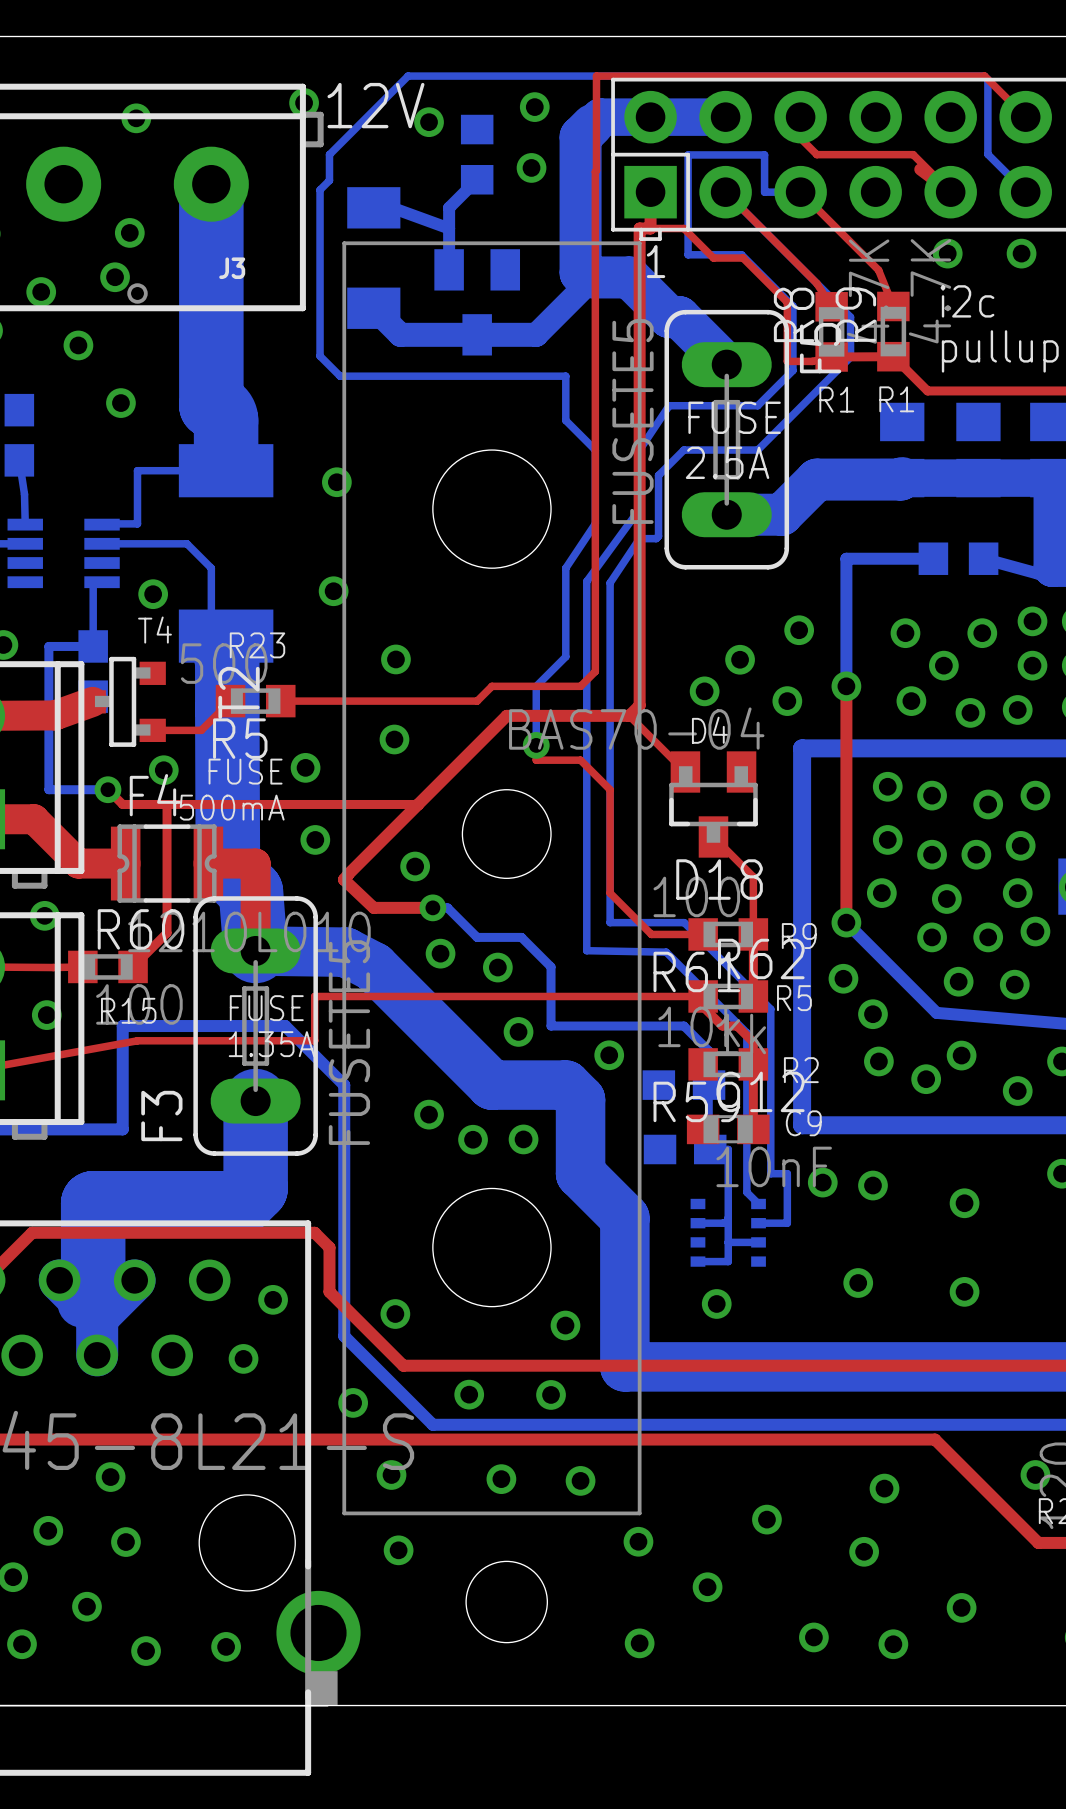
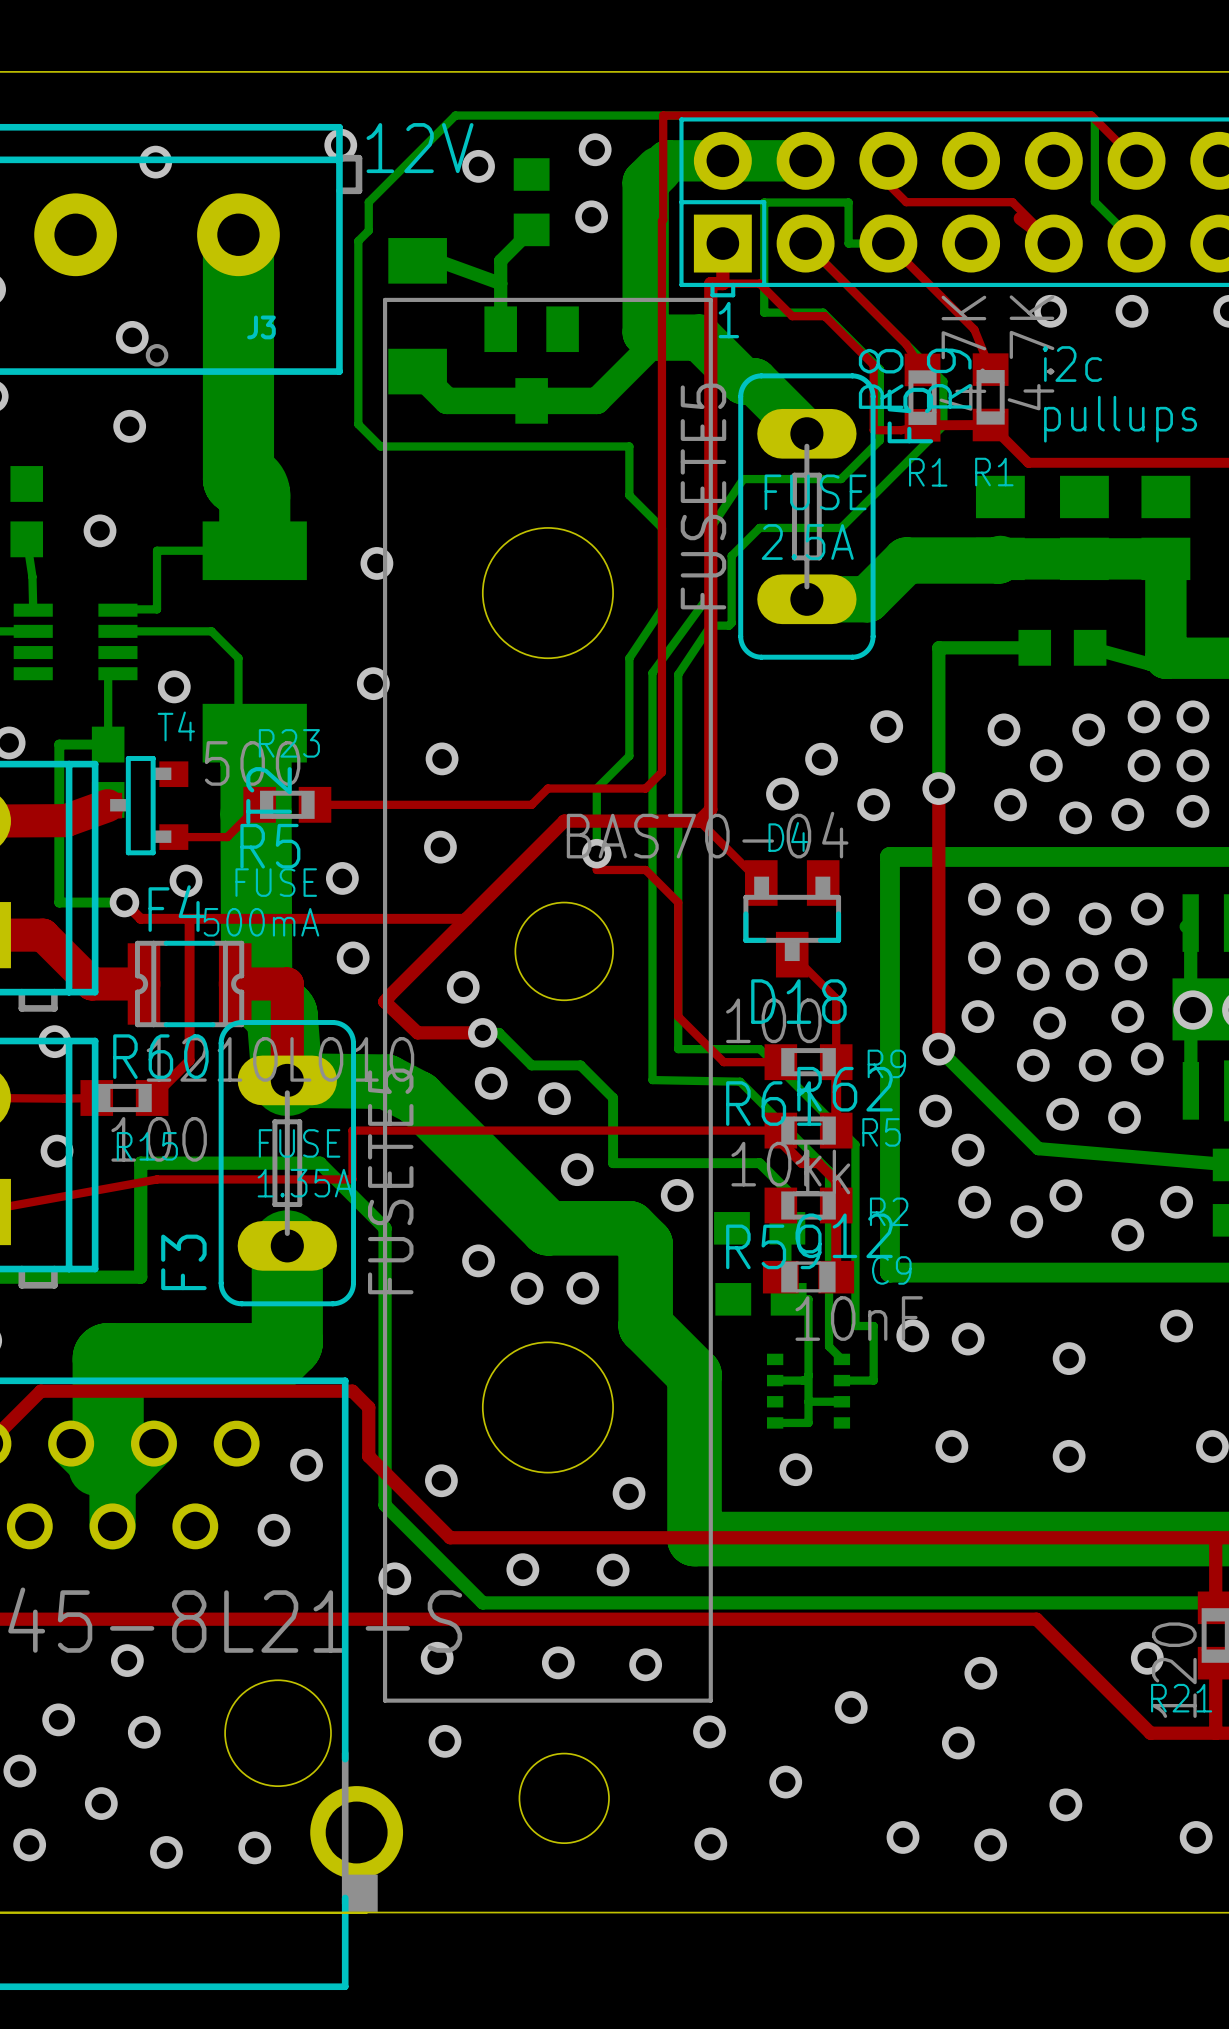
via: (129, 232) -> none
via: (41, 292) -> none
via: (78, 345) -> none
via: none -> (129, 426)
via: (120, 403) -> none
via: none -> (100, 530)

